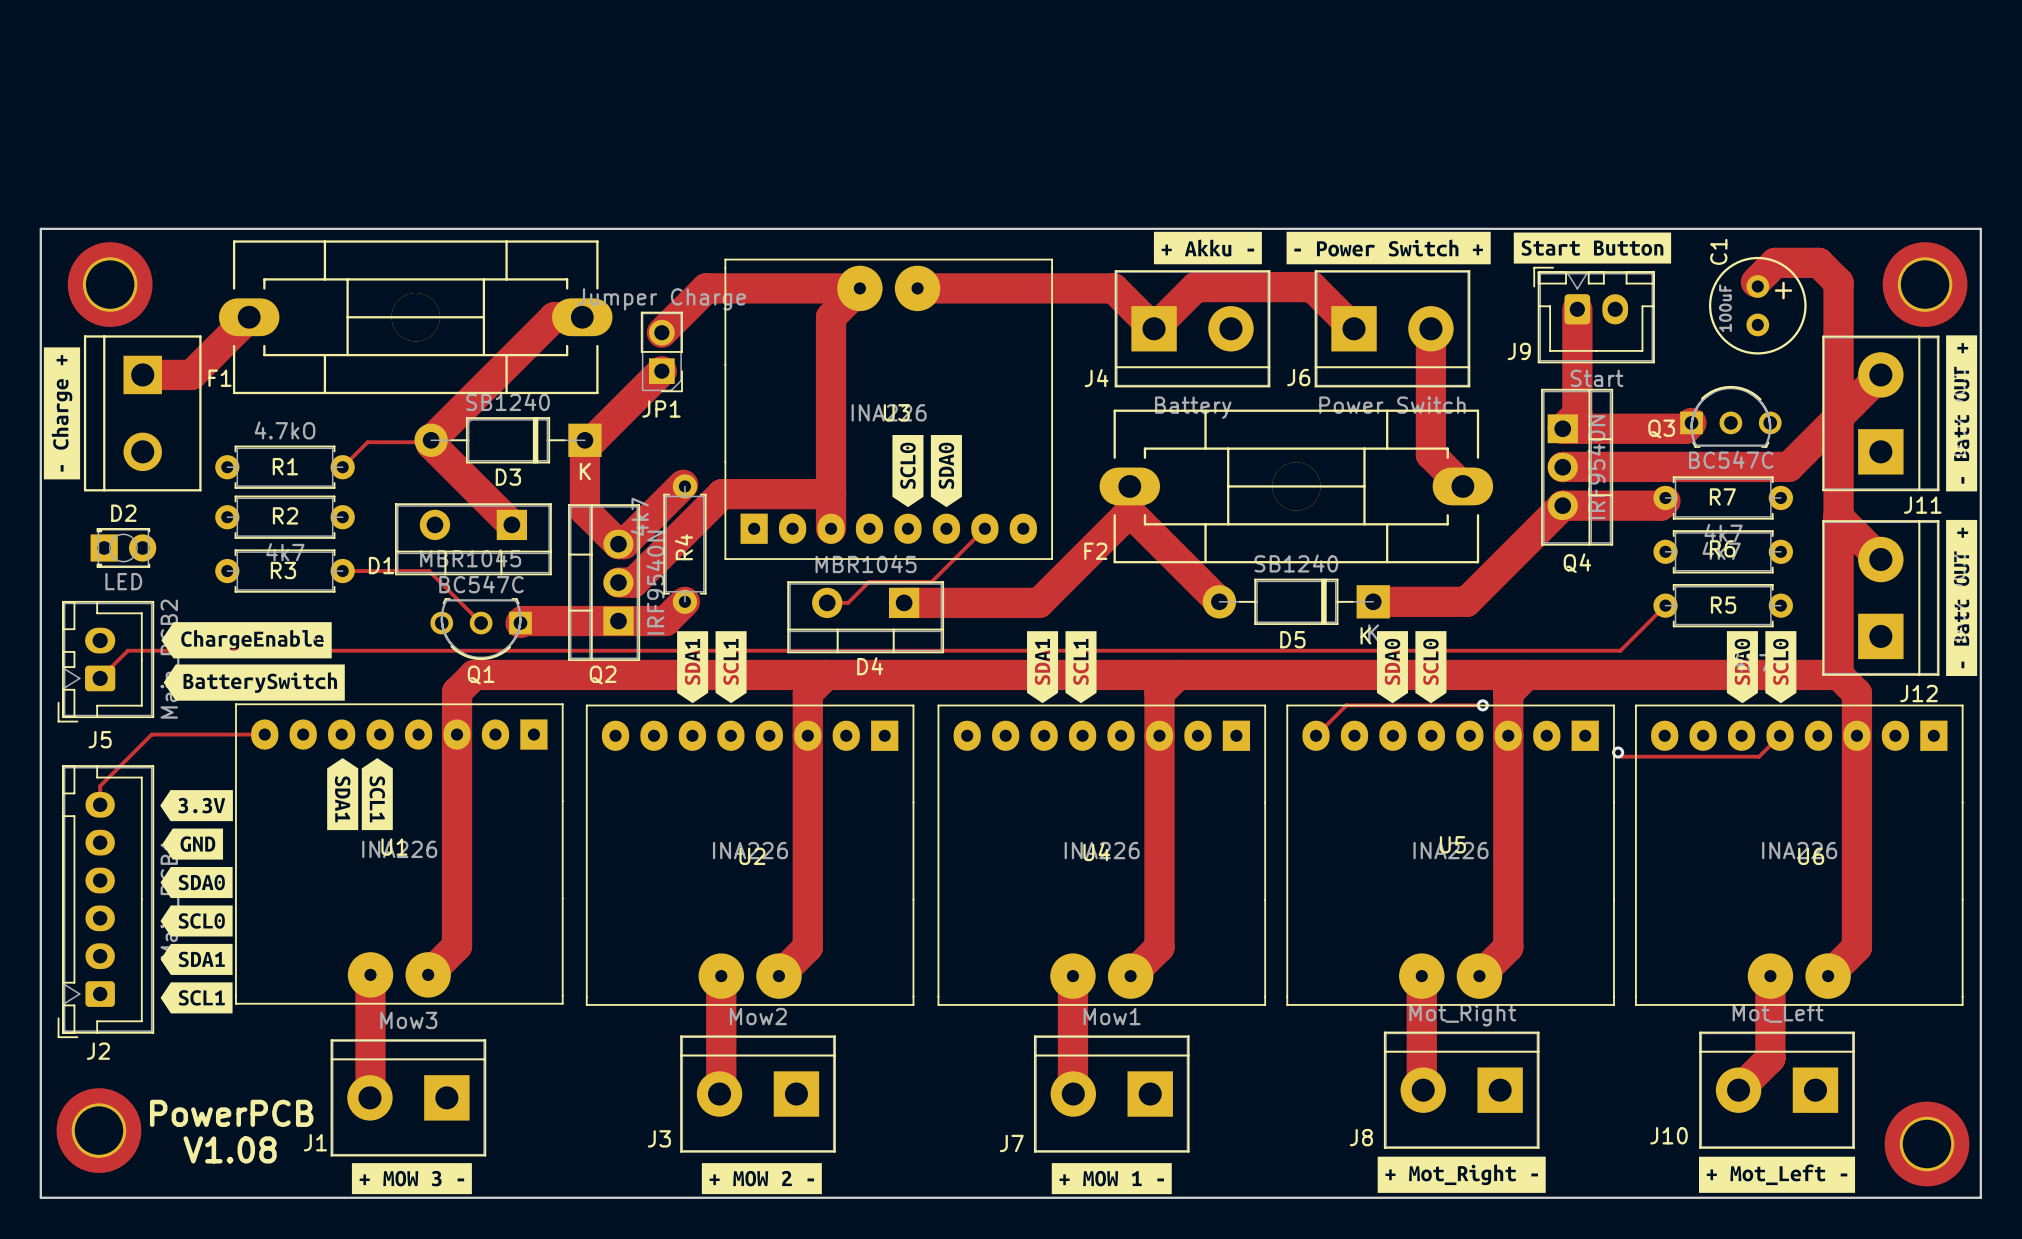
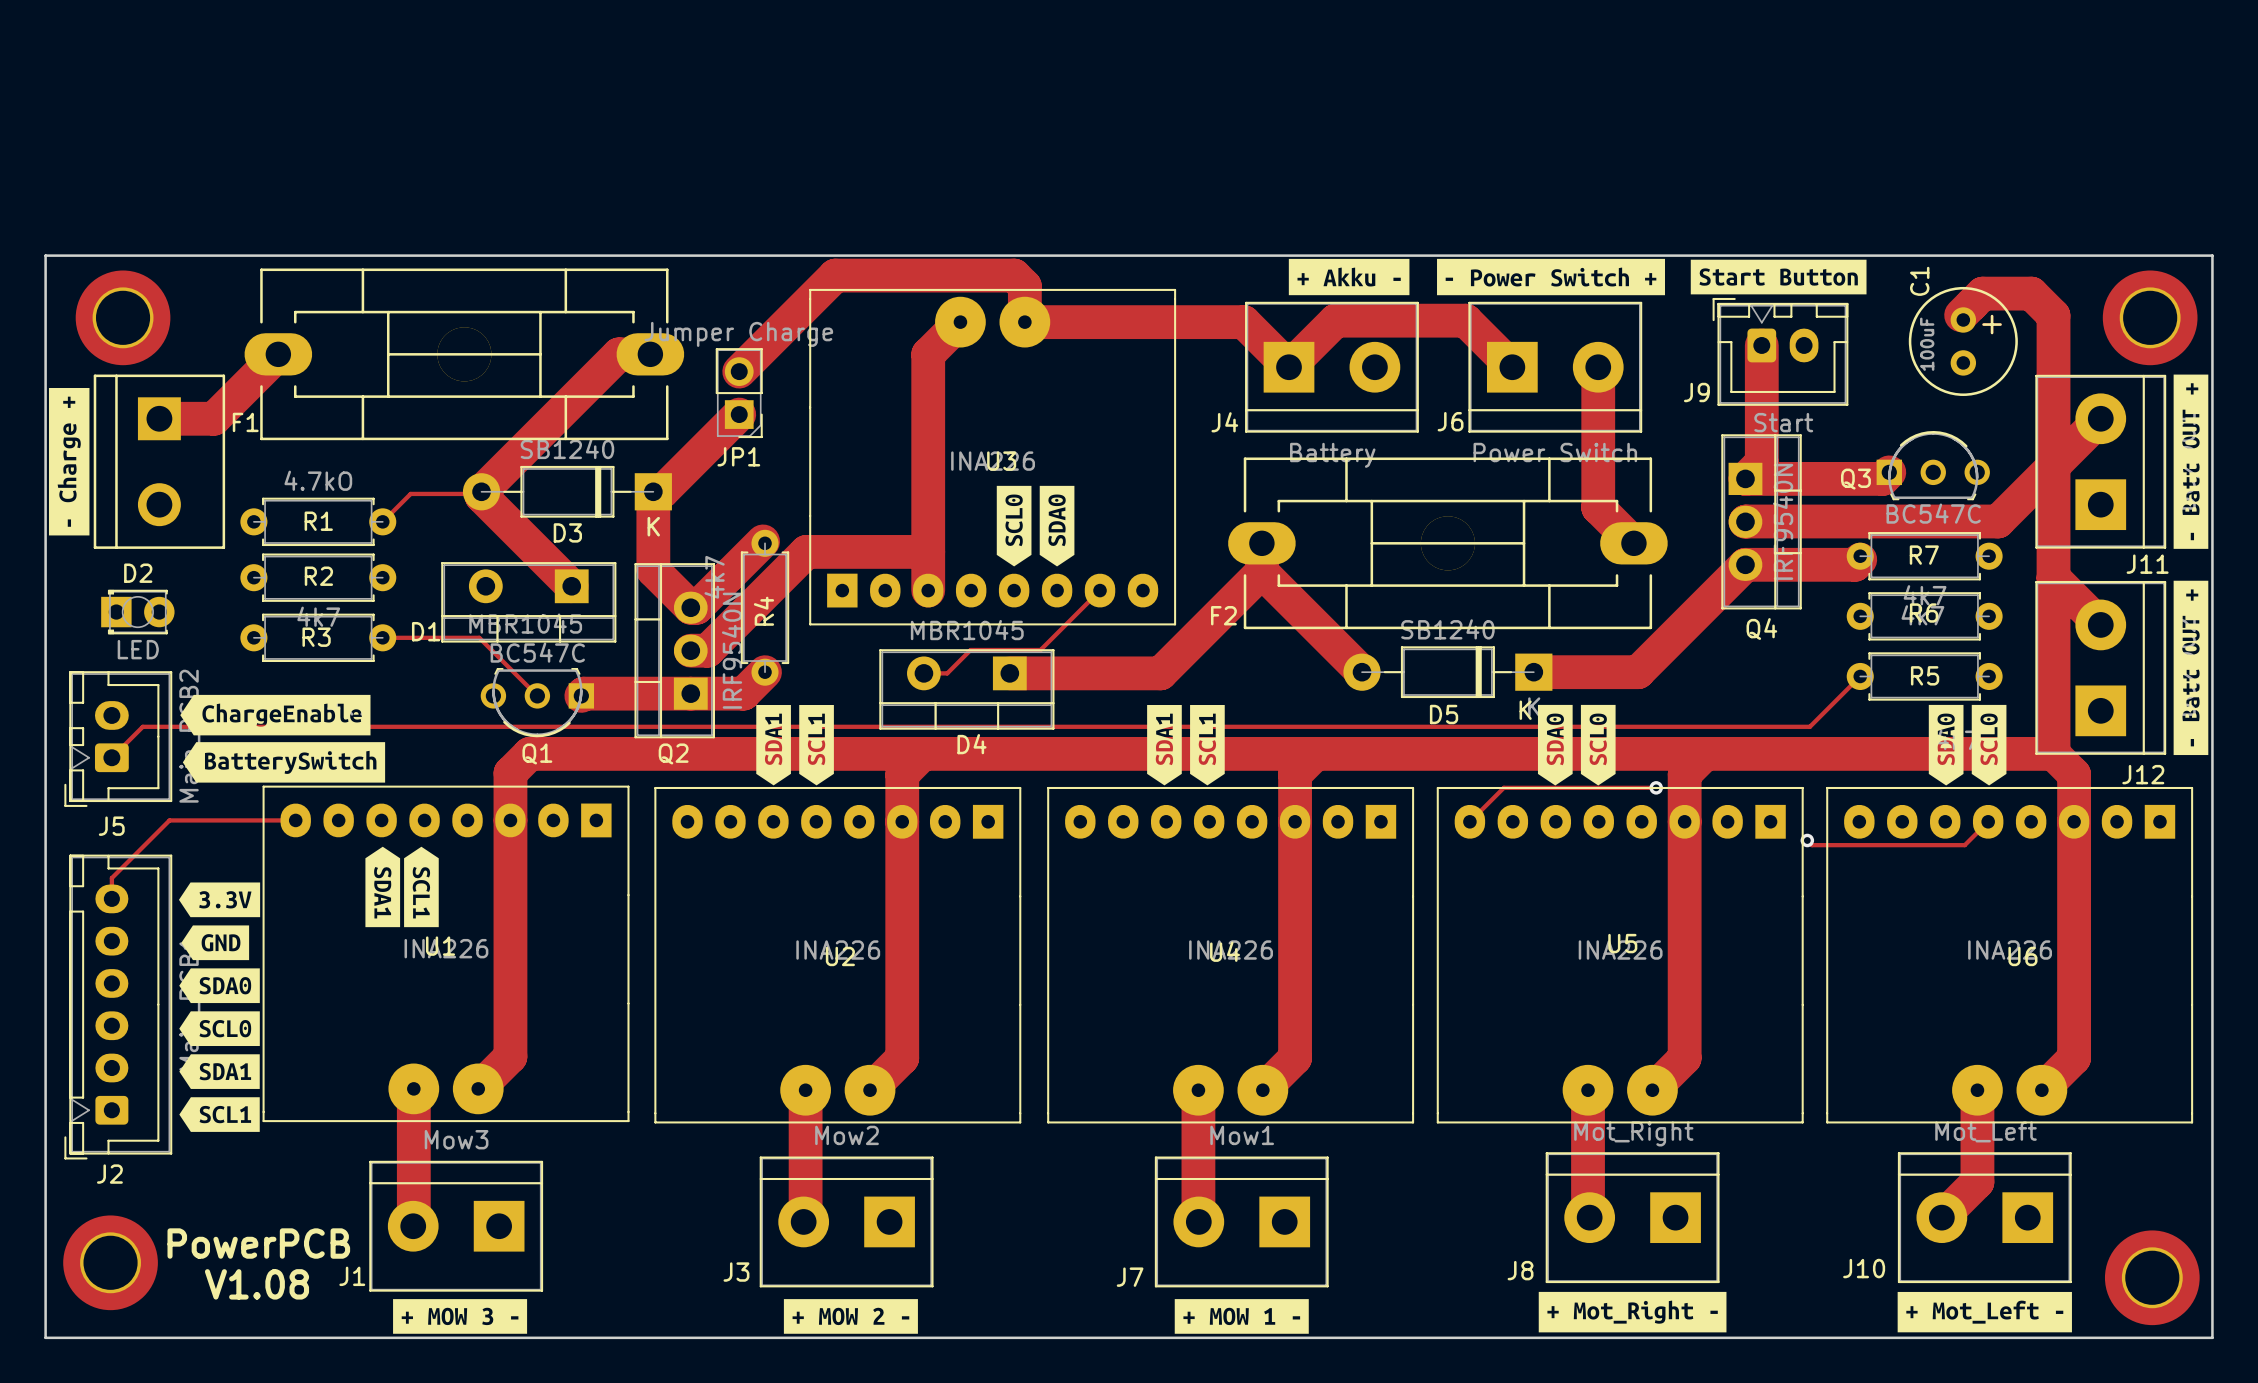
track: (706, 288) (859, 288) -> (788, 322) (835, 275) (1014, 275) (1024, 286) (1024, 322)

